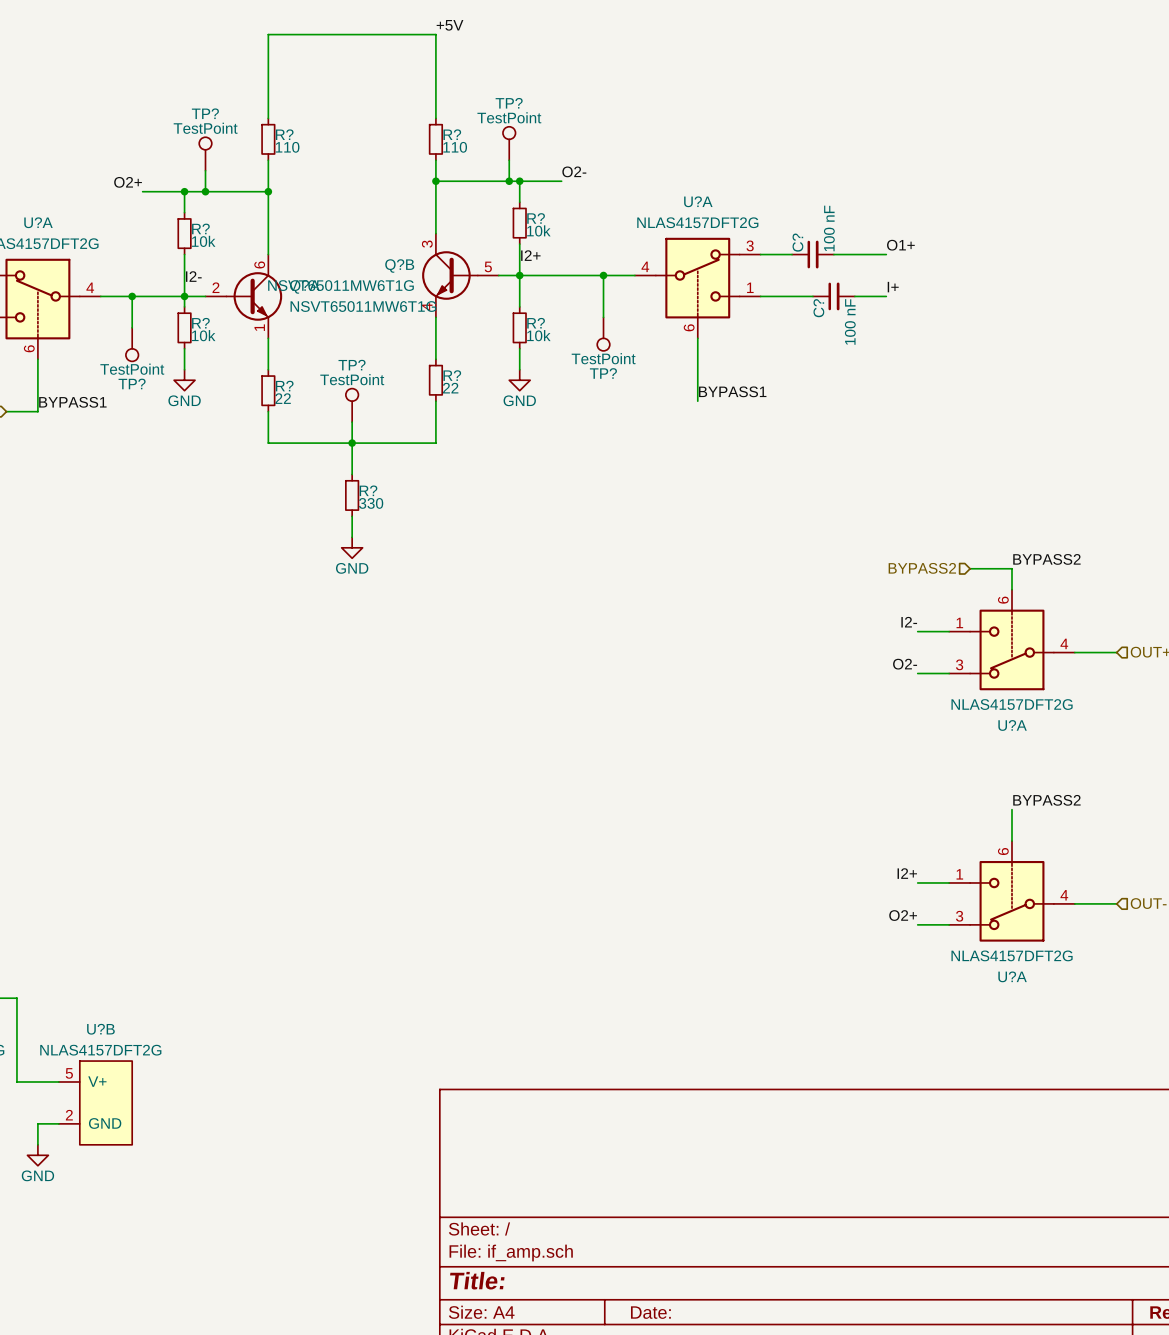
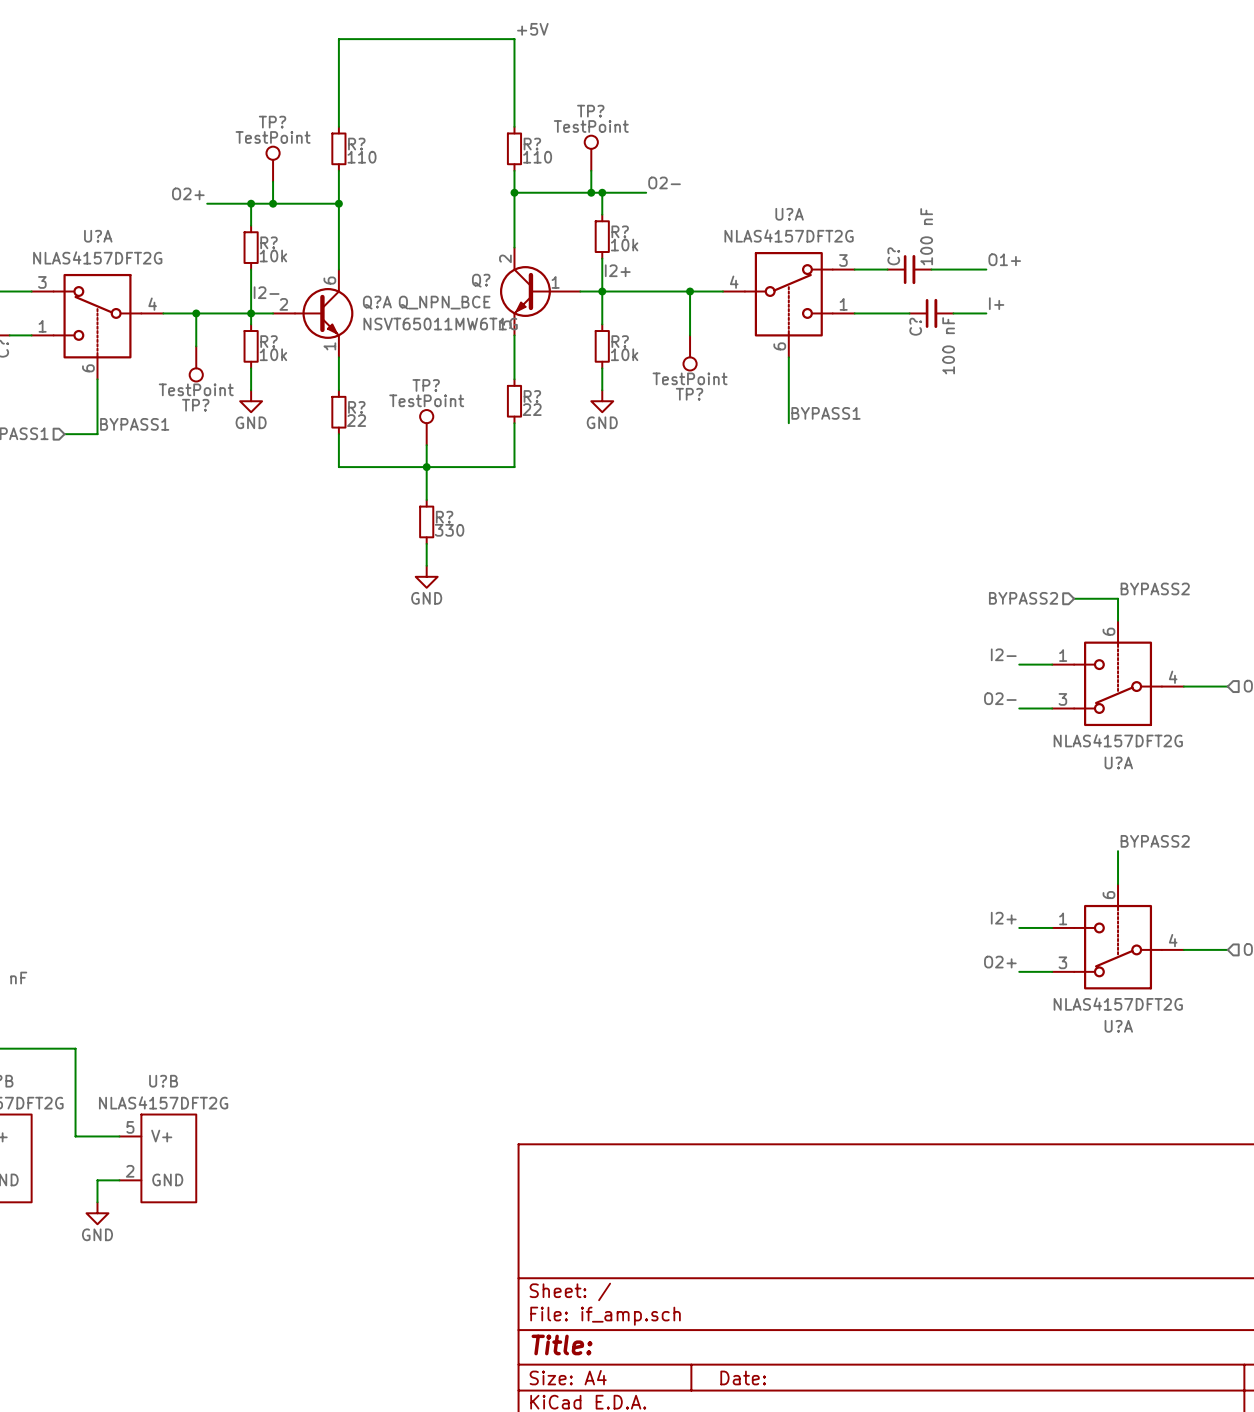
Q?B: NSVT65011MW6T1G (460, 275) -> none
Q?: none -> Q_NPN_BCE (540, 291)

